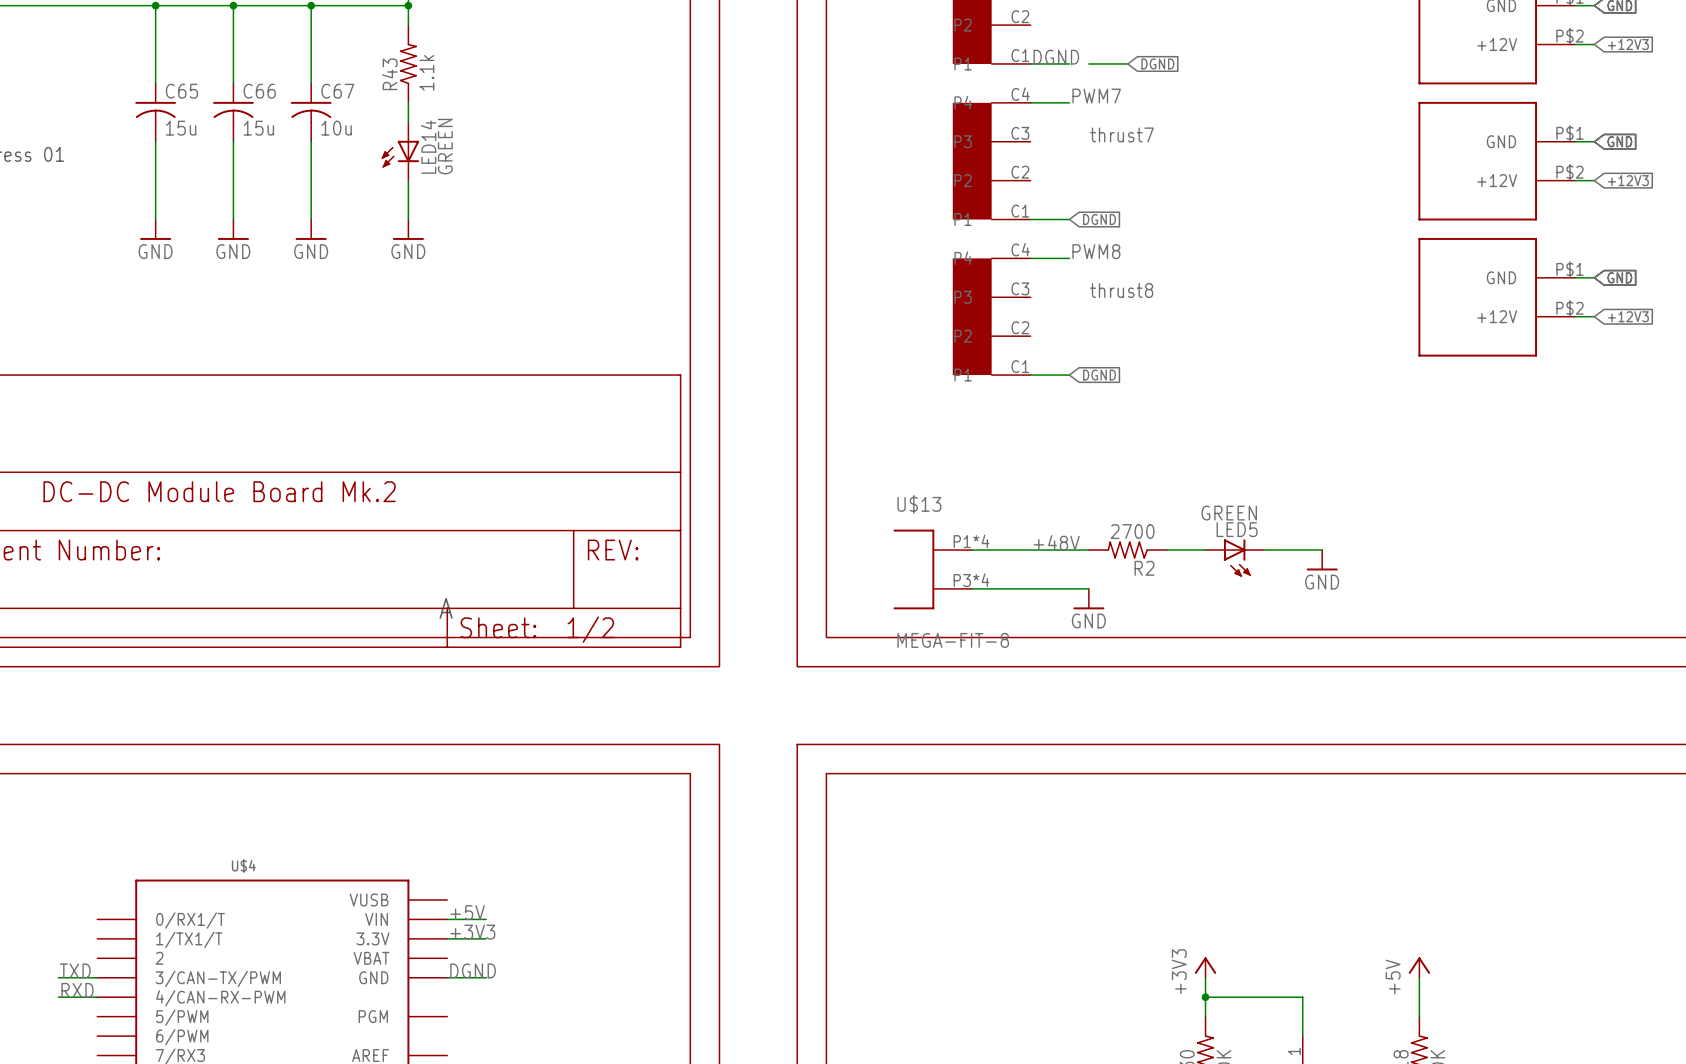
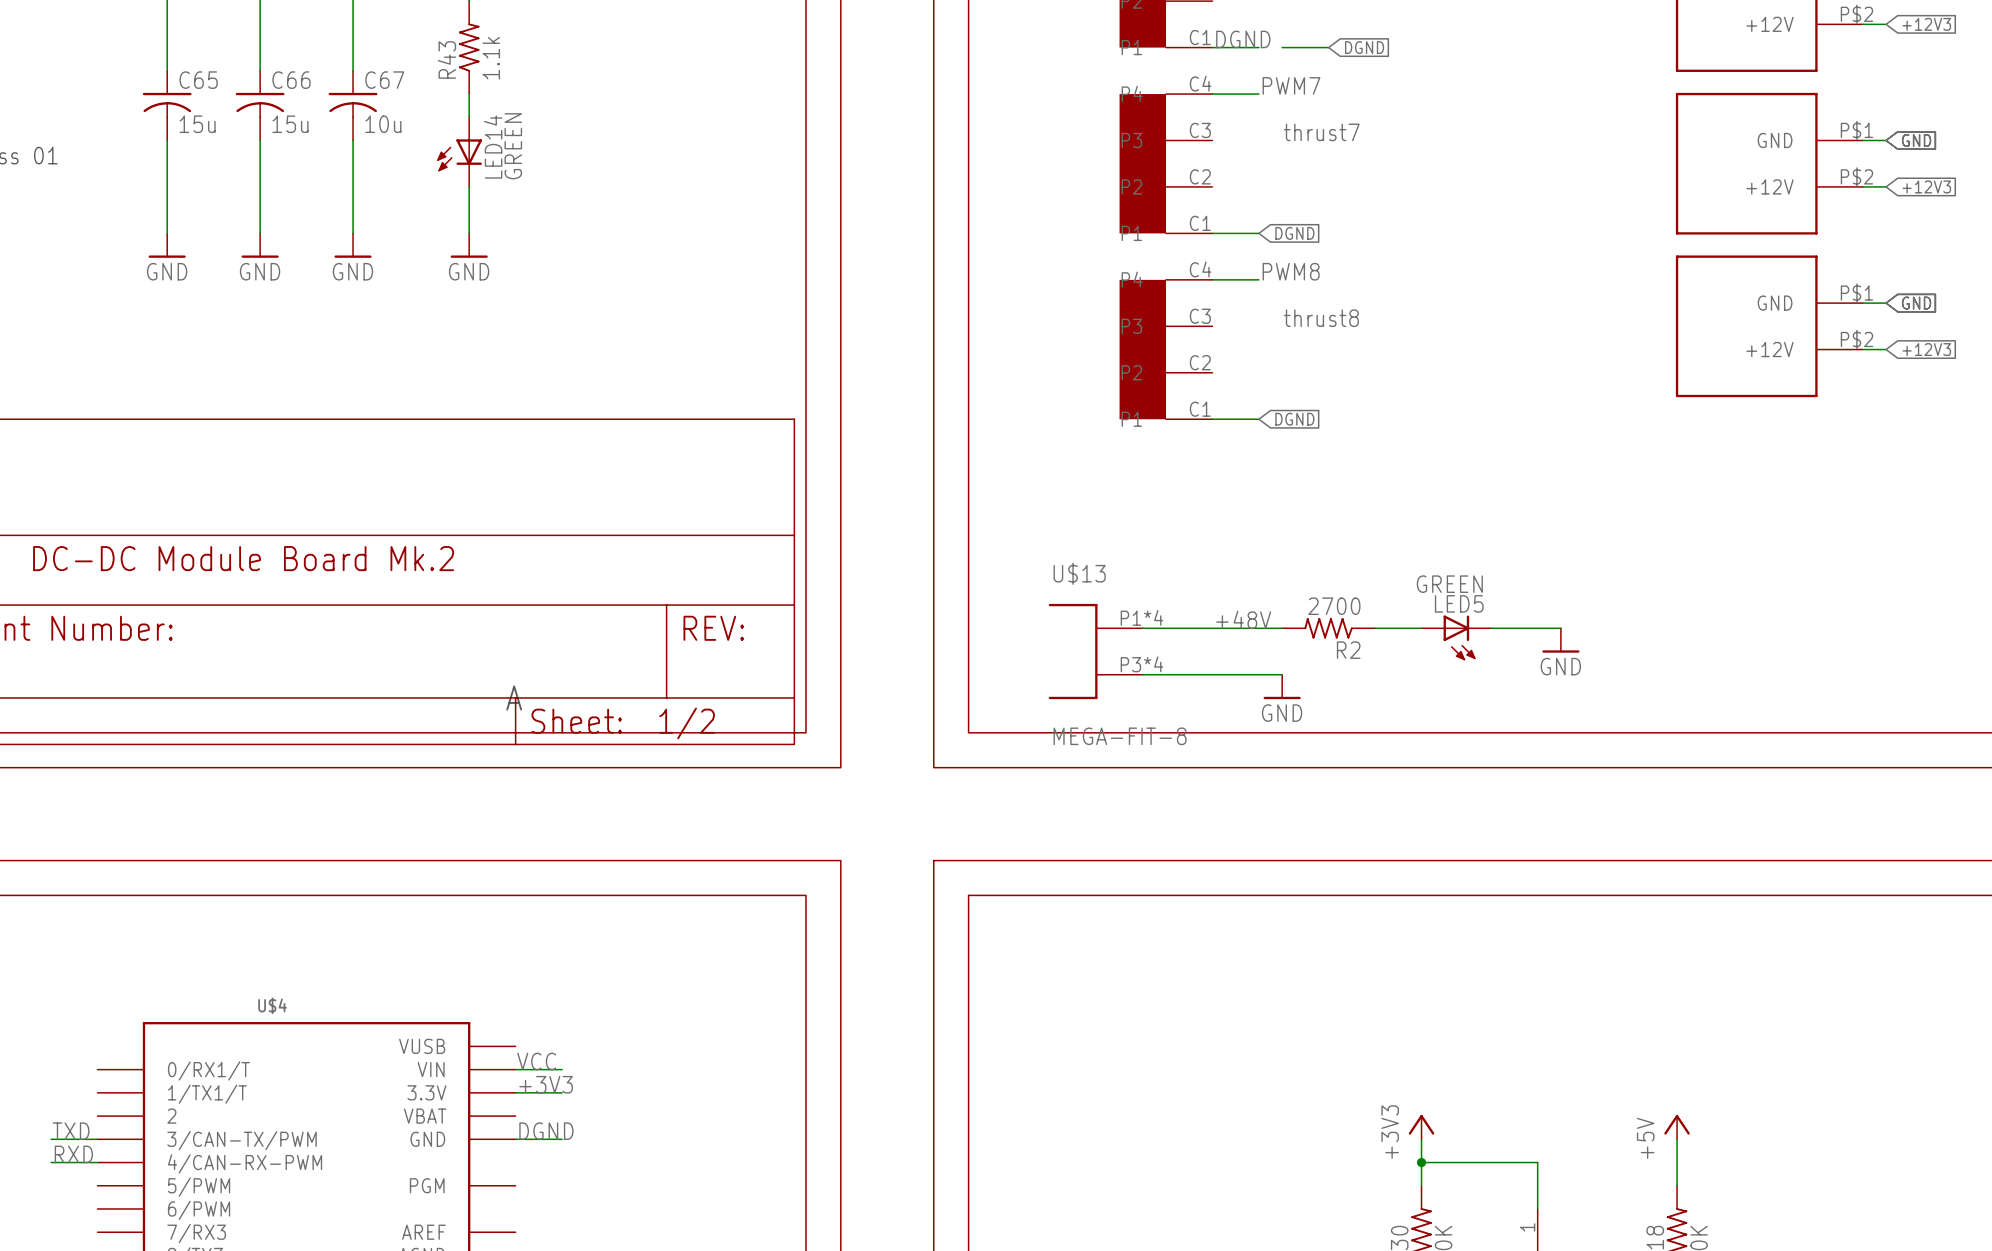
label: +5V (467, 912) -> VCC (536, 1061)

